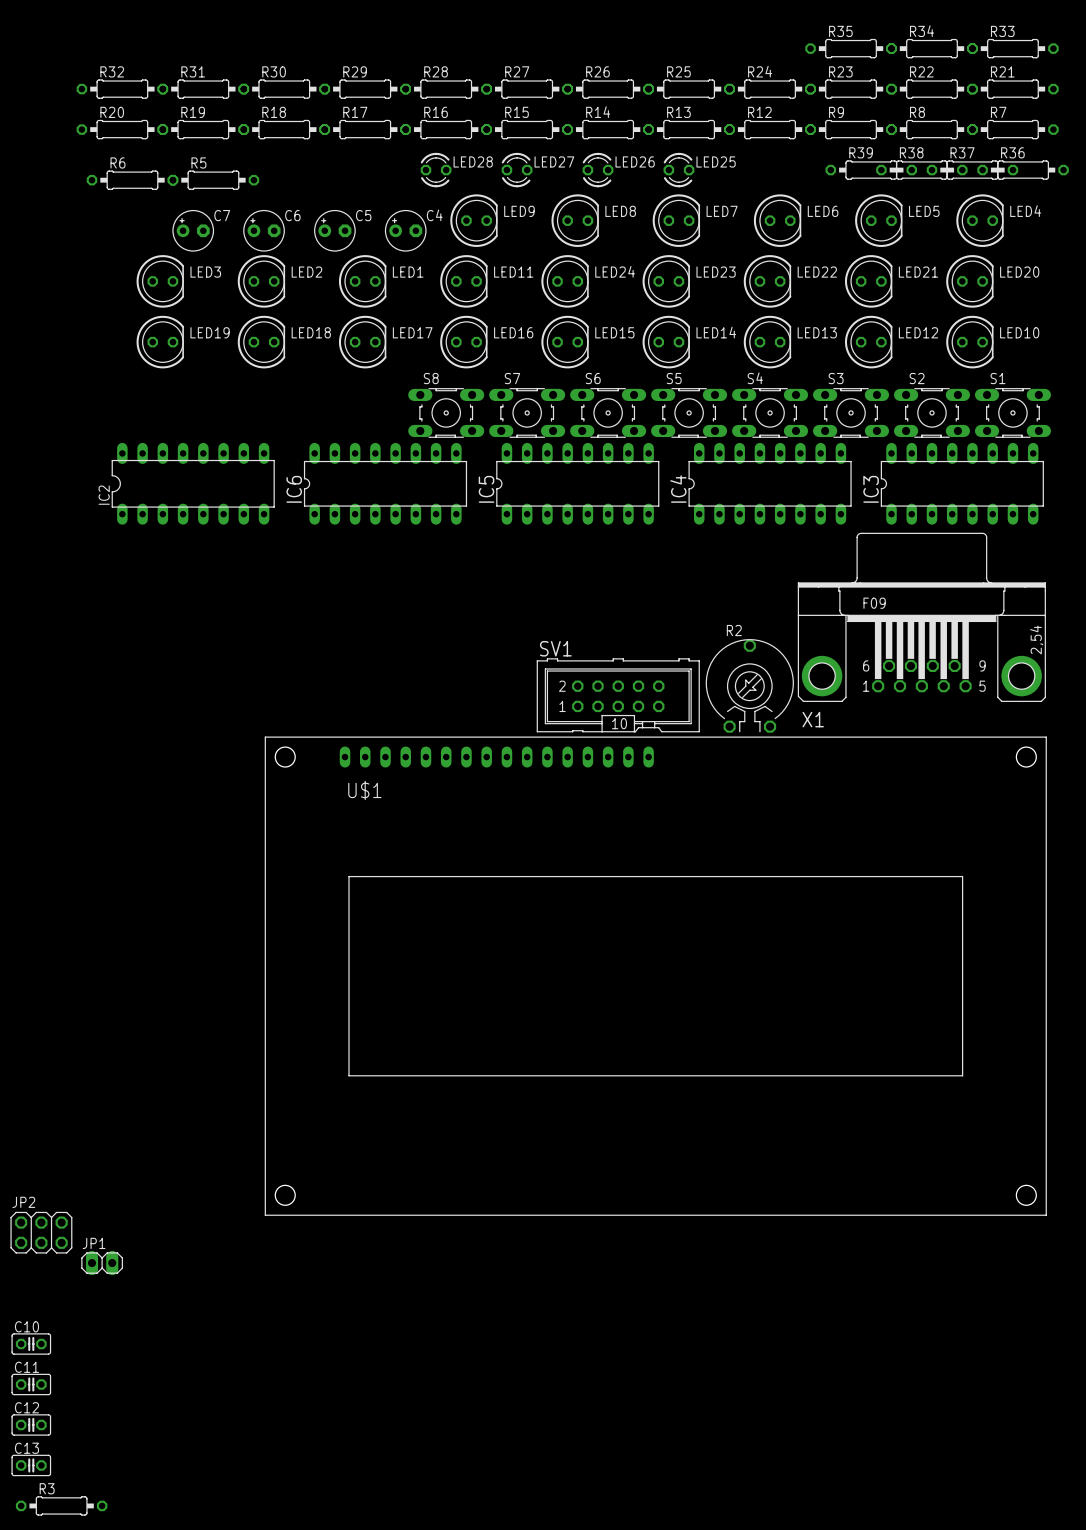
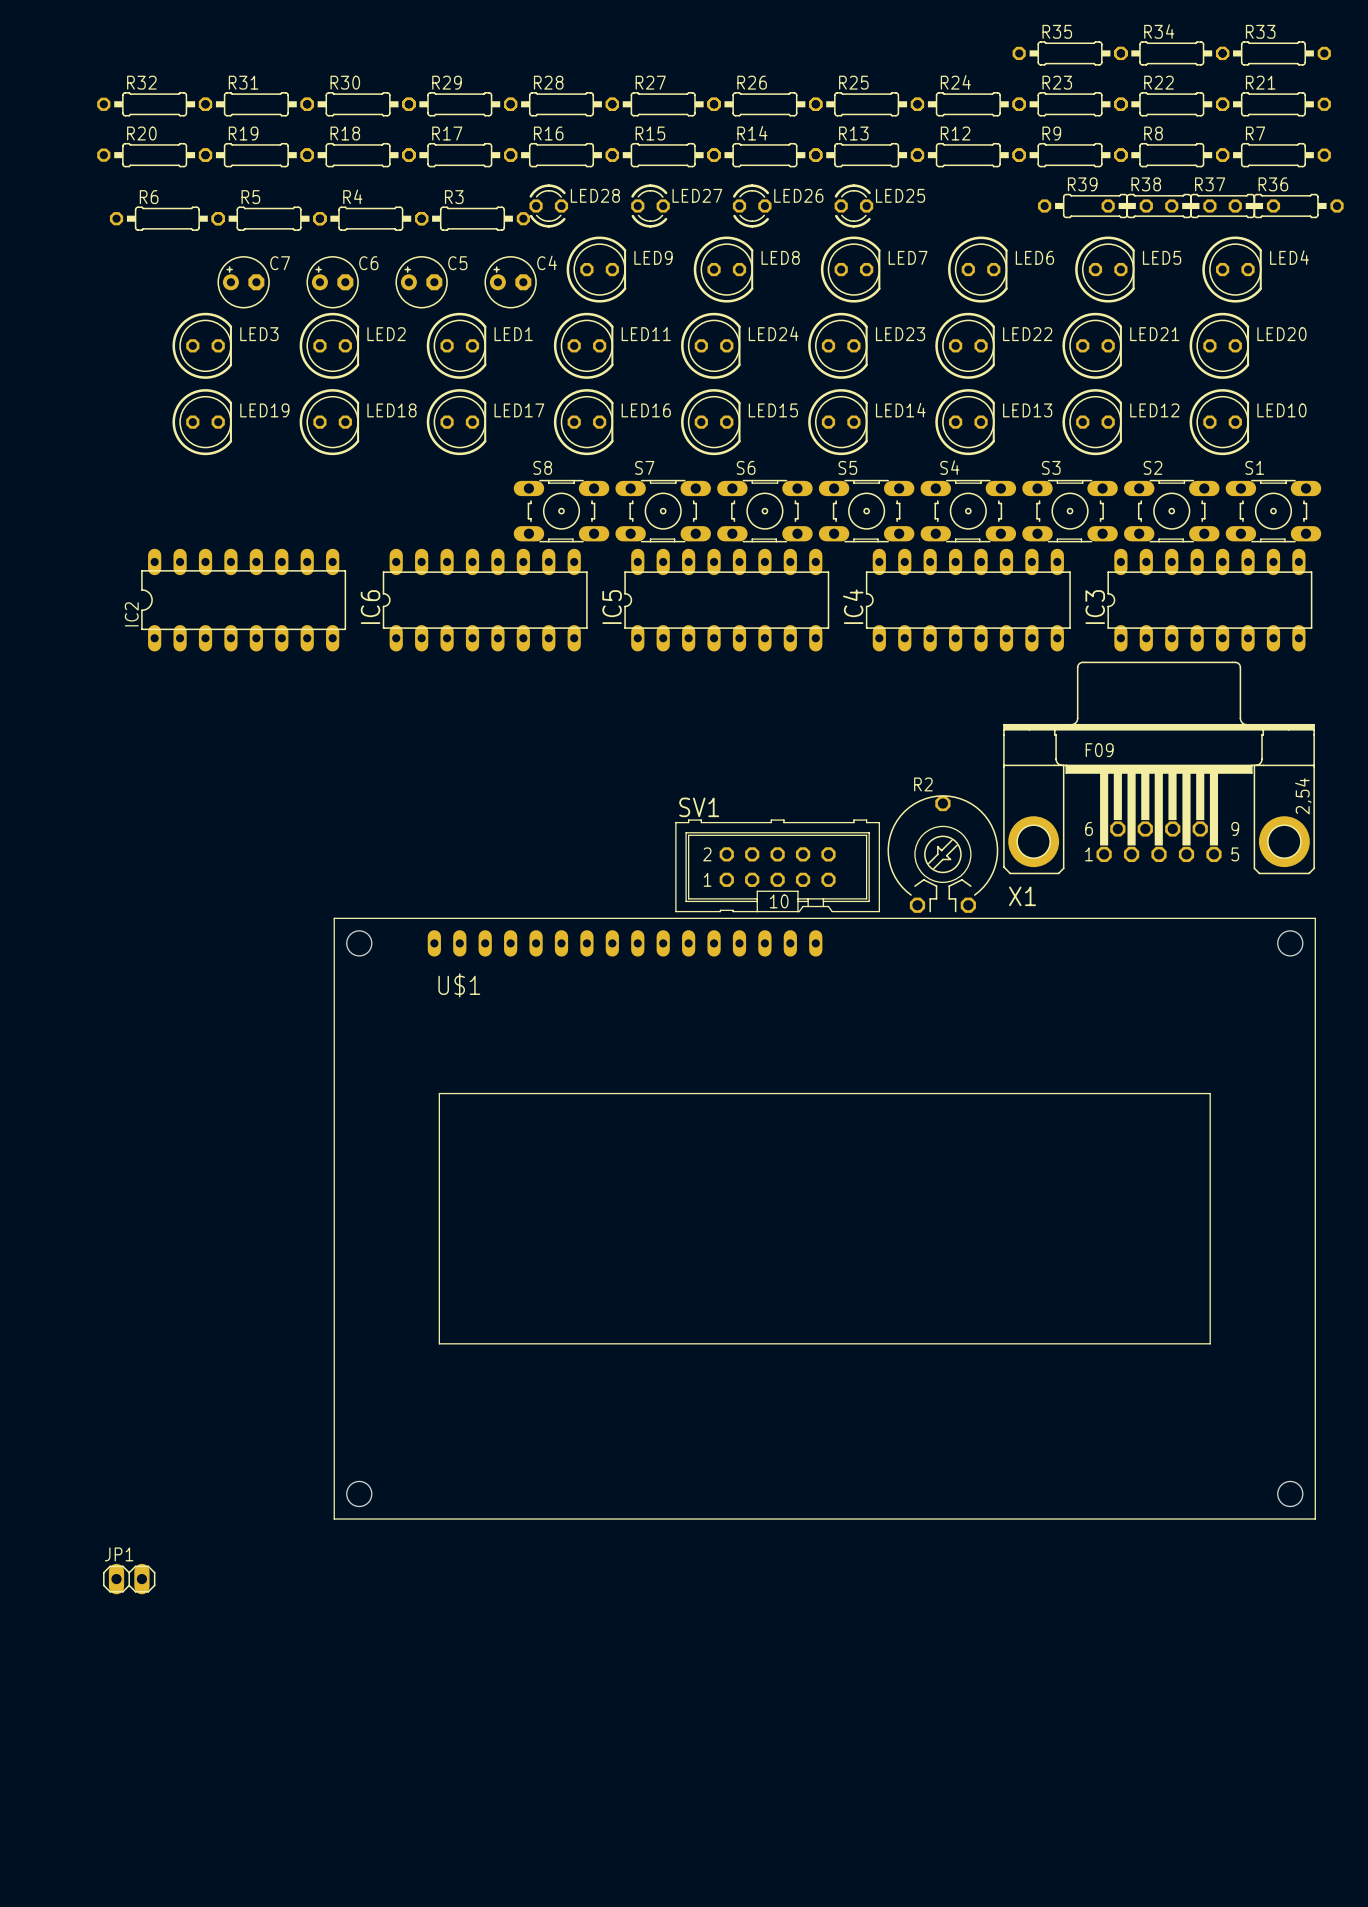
R4: none -> (370, 218)
JP2: (41, 1232) -> none
C10: (31, 1344) -> none
C11: (31, 1384) -> none
C12: (31, 1424) -> none
C13: (31, 1465) -> none
R3 position: (61, 1505) -> (472, 218)

